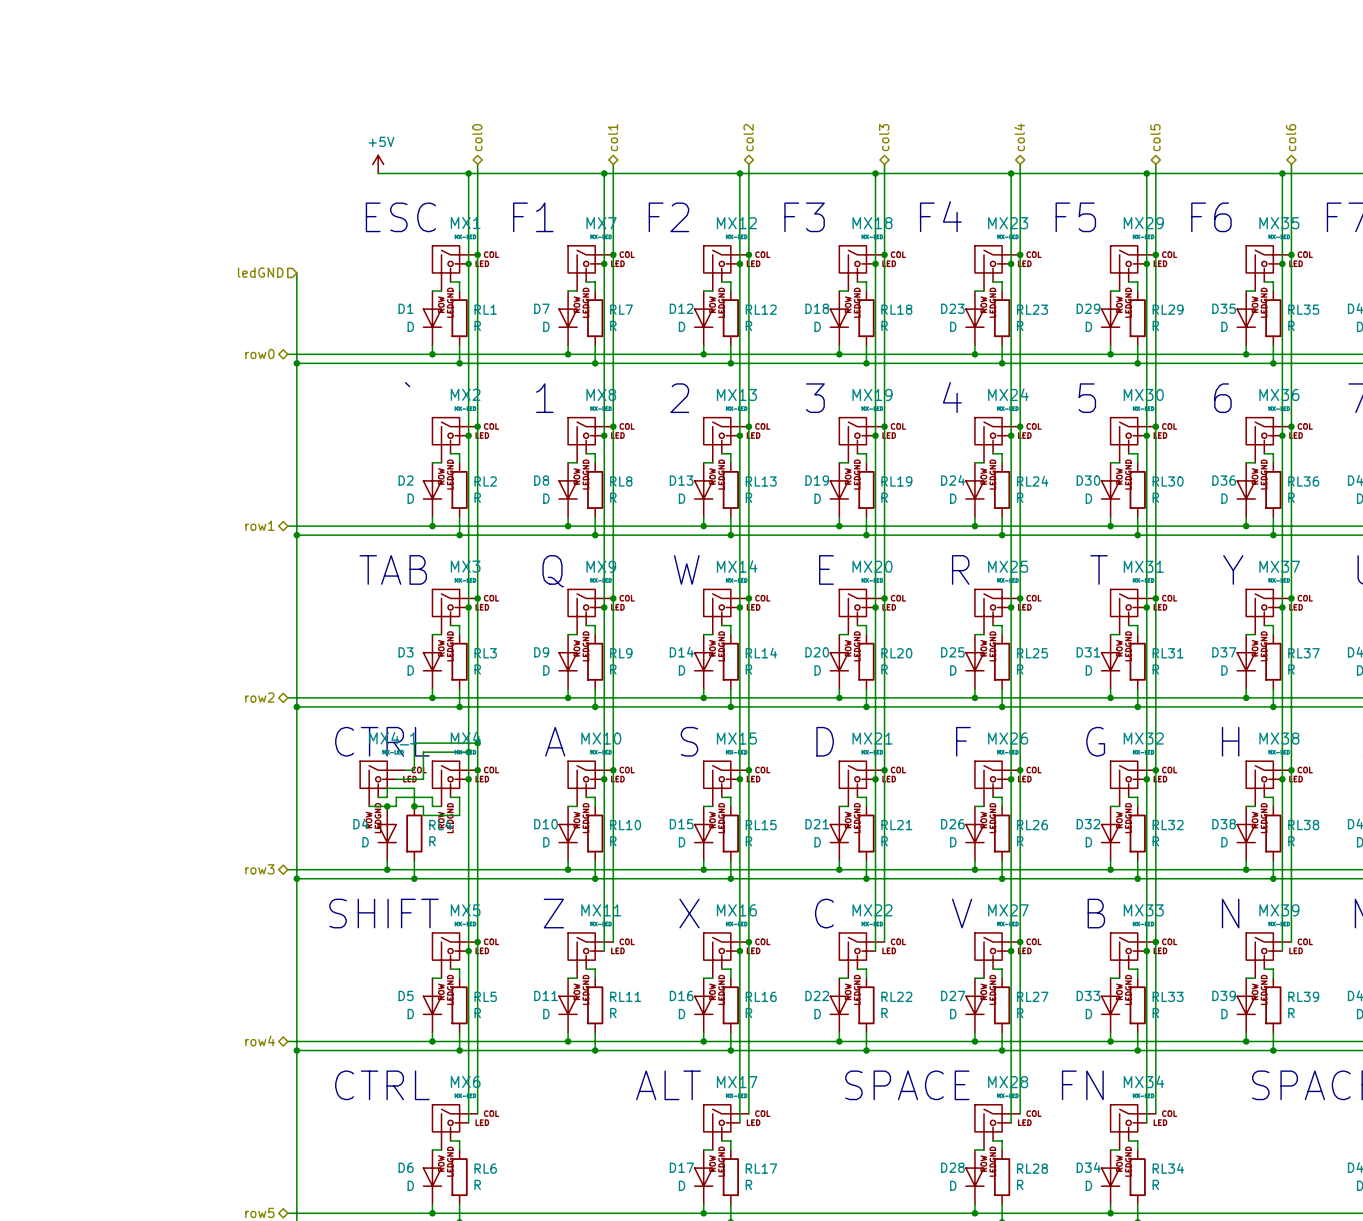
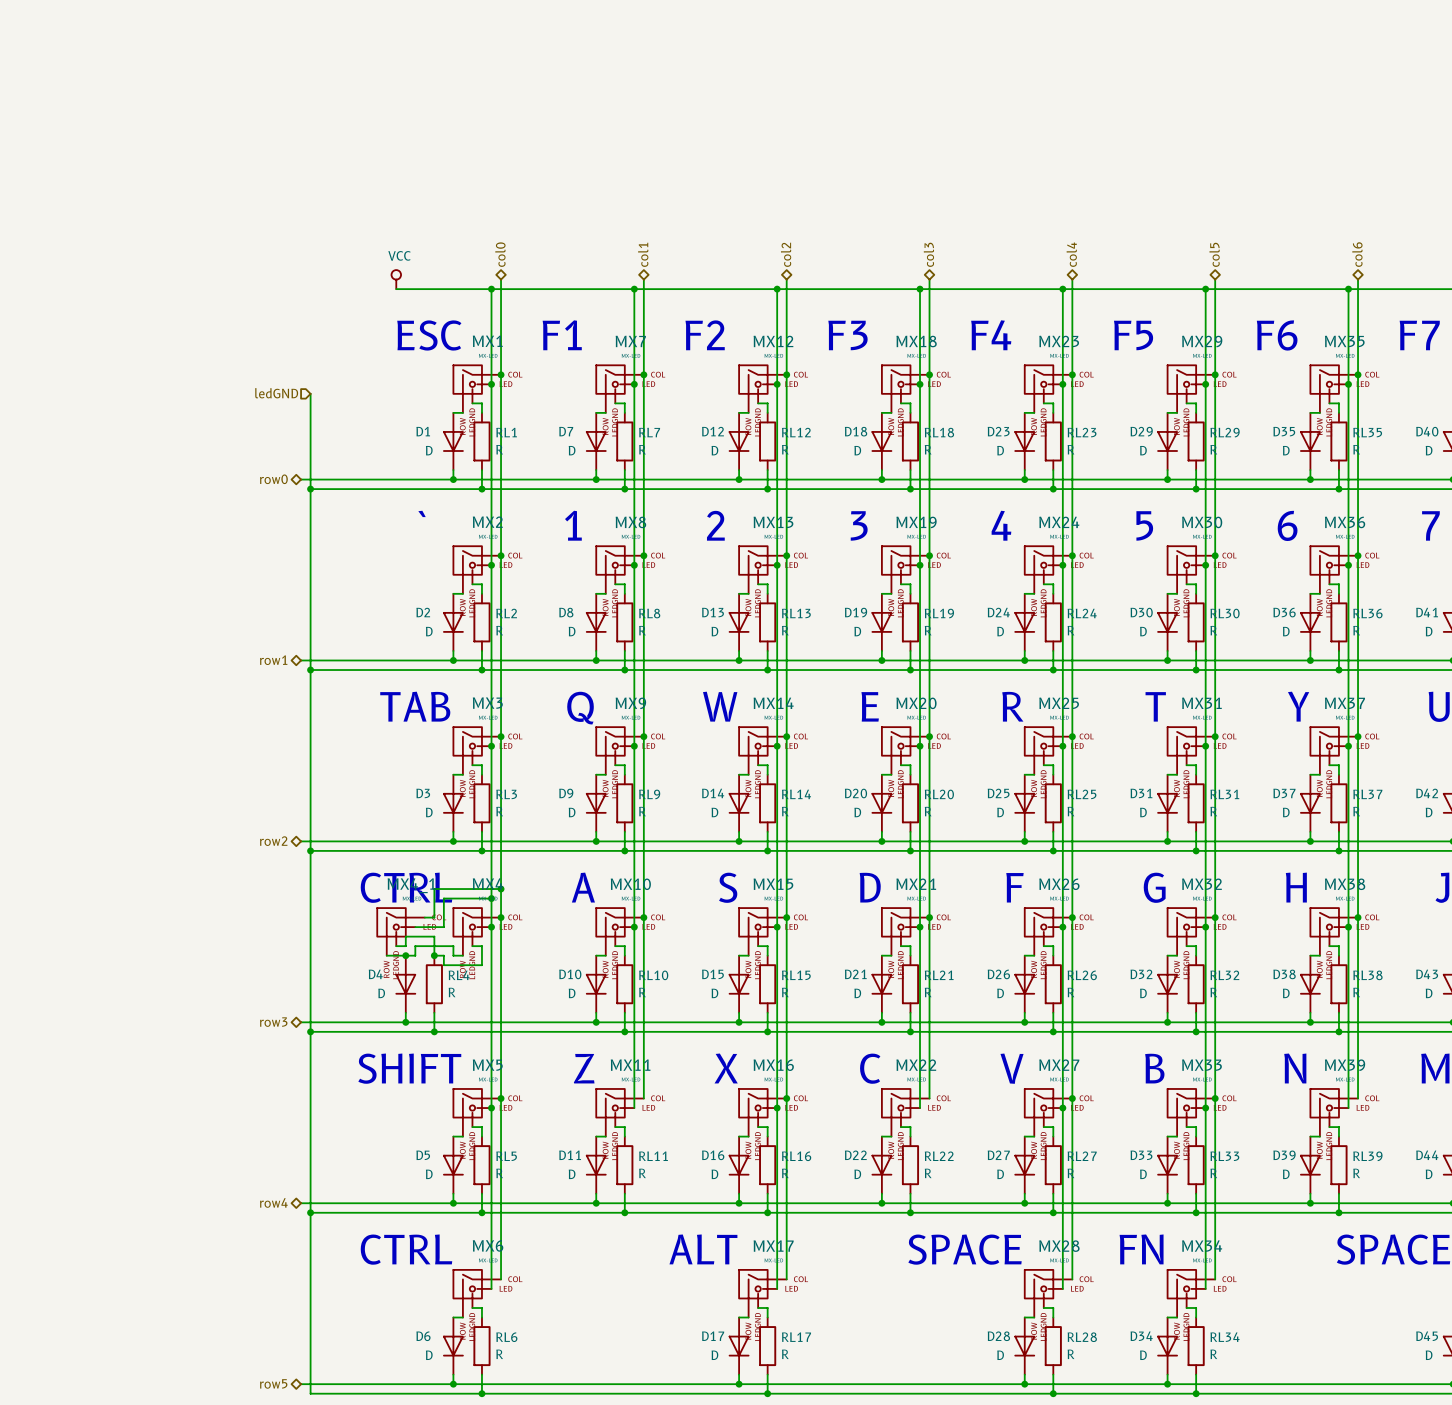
power symbol: +5V (378, 164) -> VCC (396, 279)

